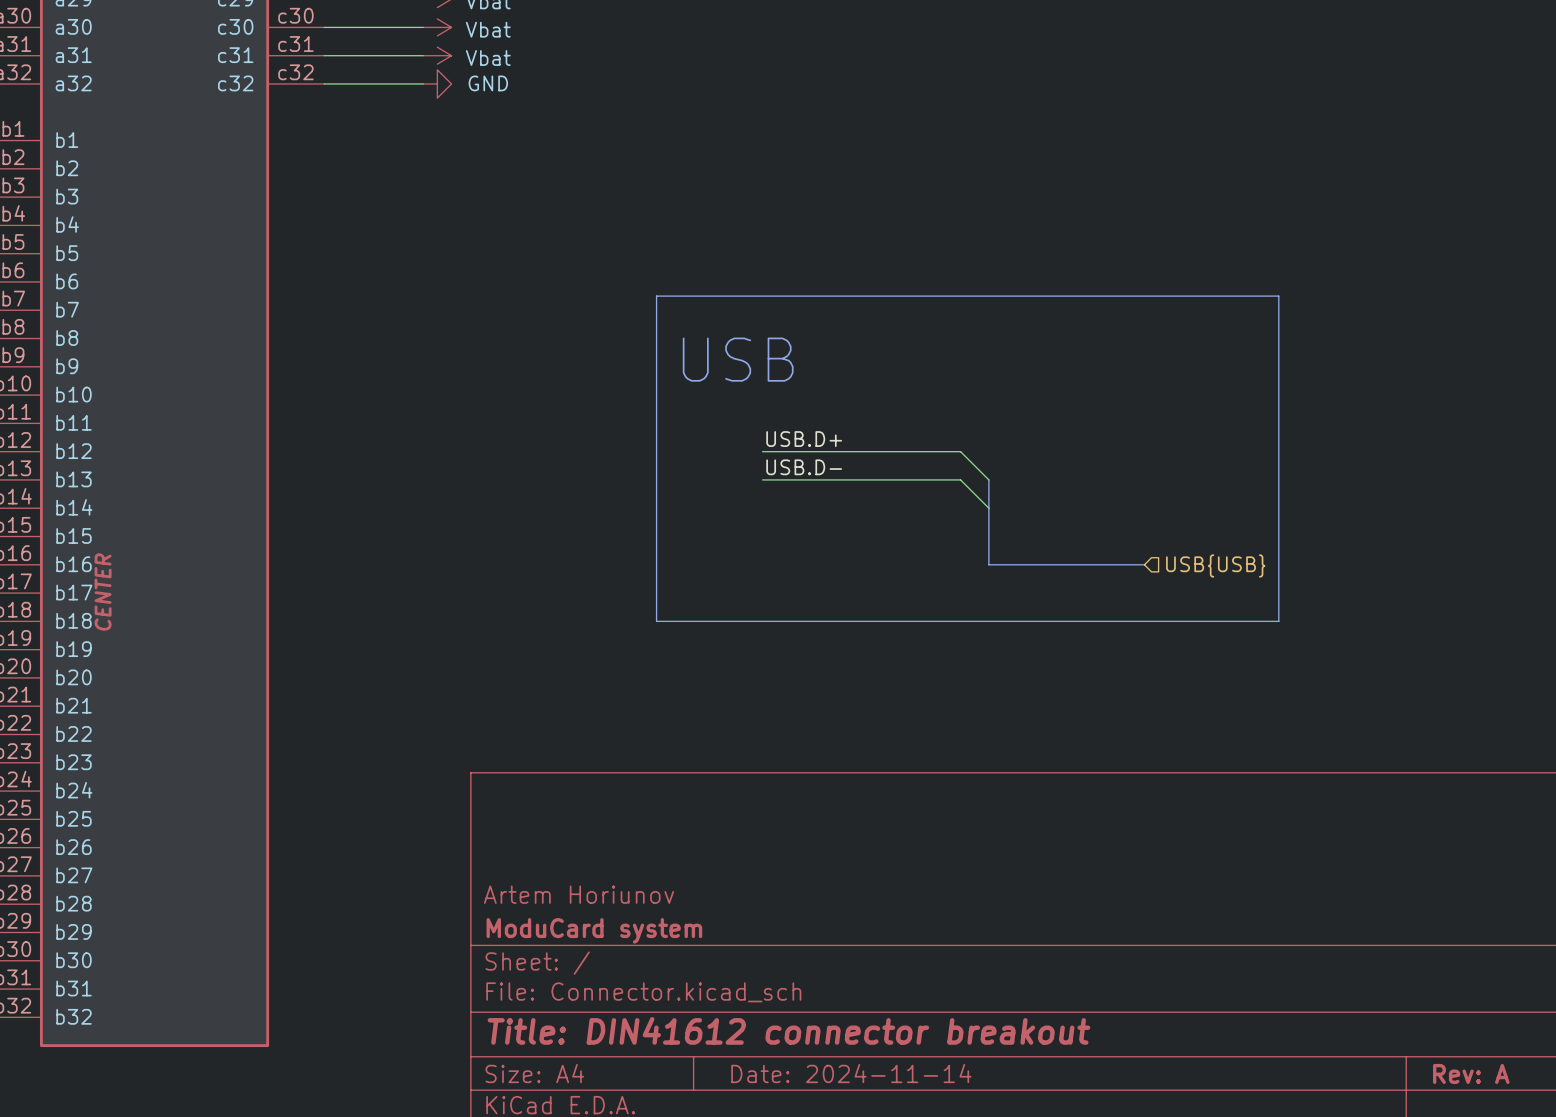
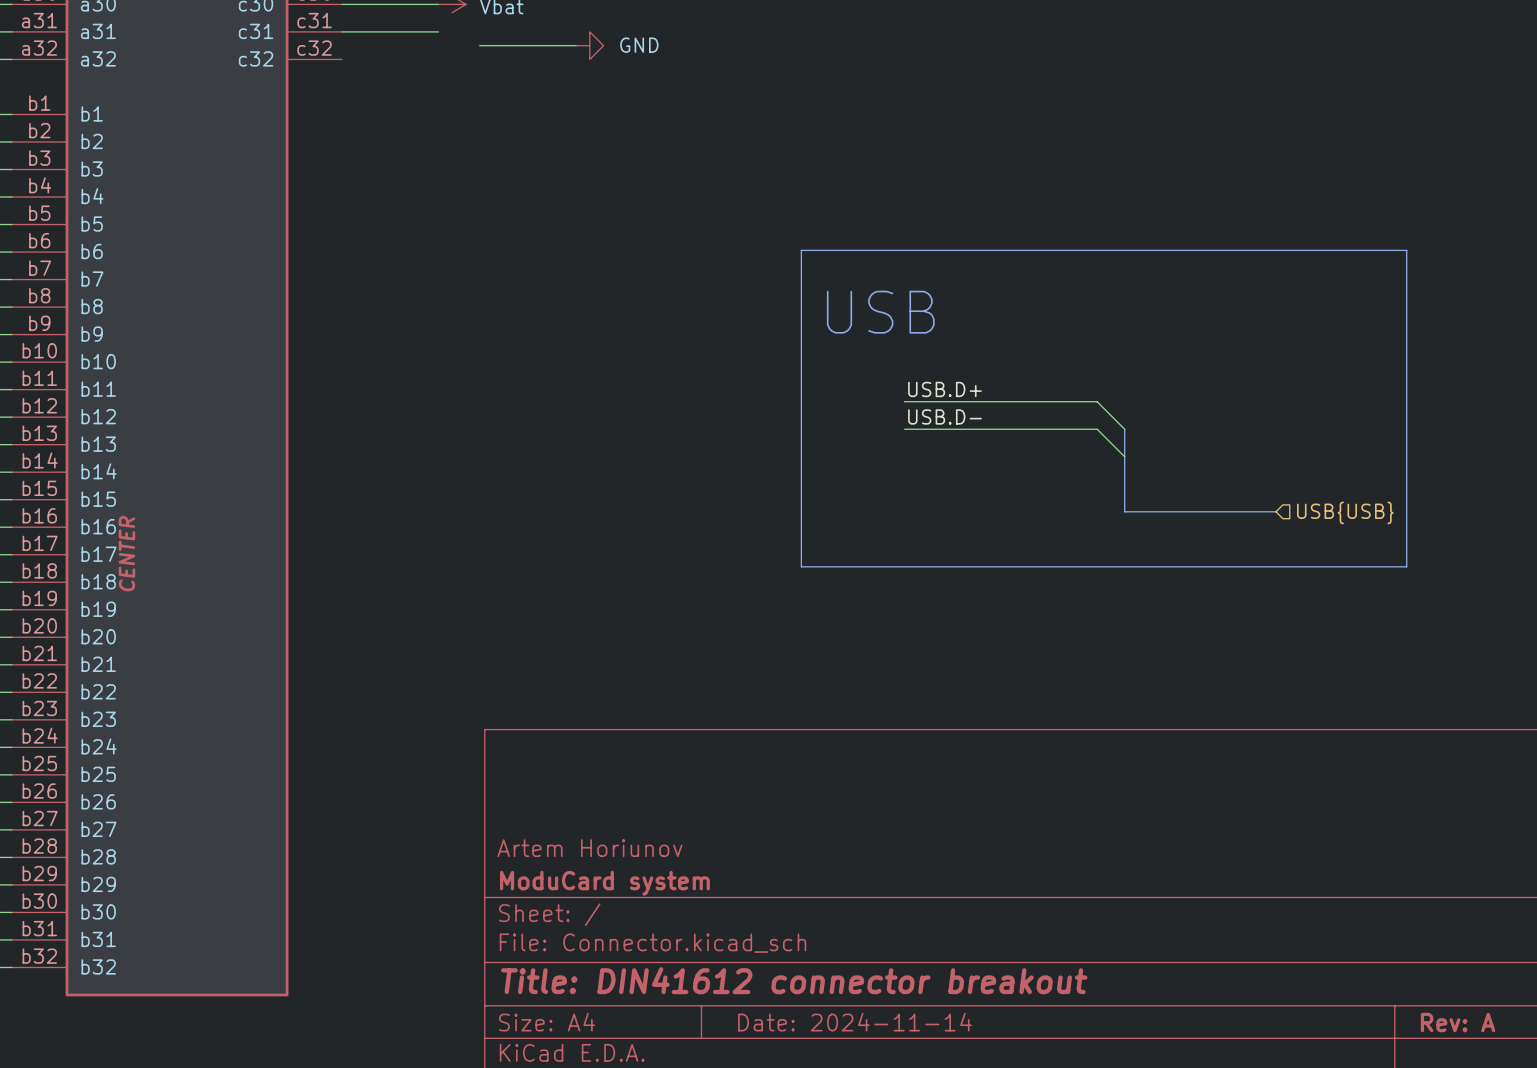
power symbol: Vbat (437, 55) -> none
wire: (324, 83) (423, 83) -> (479, 45) (576, 45)
power symbol position: GND (437, 83) -> GND (589, 45)
line: (656, 296) (1278, 296) (1278, 621) (656, 621) (656, 296) -> (801, 250) (1406, 250) (1406, 566) (801, 566) (801, 250)
text position: USB (738, 359) -> USB (880, 312)
label position: USB.D+ (804, 439) -> USB.D+ (944, 389)
wire: (762, 451) (960, 451) (988, 479) -> (904, 401) (1097, 401) (1124, 429)
label position: USB.D- (804, 467) -> USB.D- (944, 416)
wire: (762, 479) (960, 479) (988, 508) -> (904, 429) (1097, 429) (1124, 456)
bus: (988, 479) (988, 564) (1144, 564) -> (1124, 429) (1124, 511) (1276, 511)
hierarchical label position: USB{USB} (1215, 565) -> USB{USB} (1345, 512)

